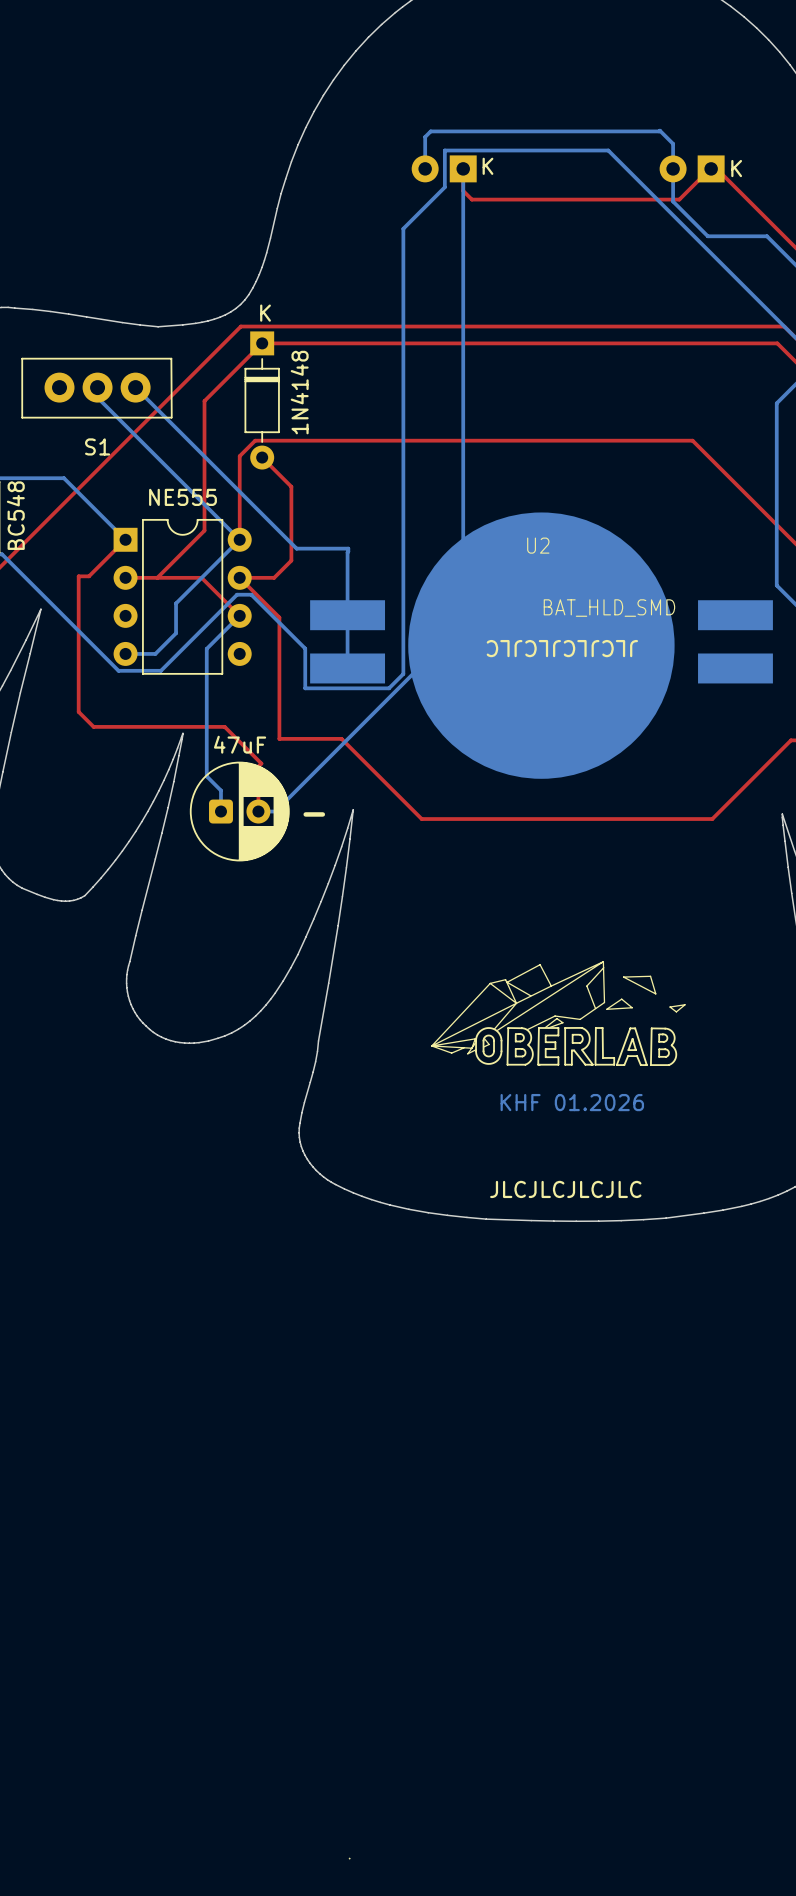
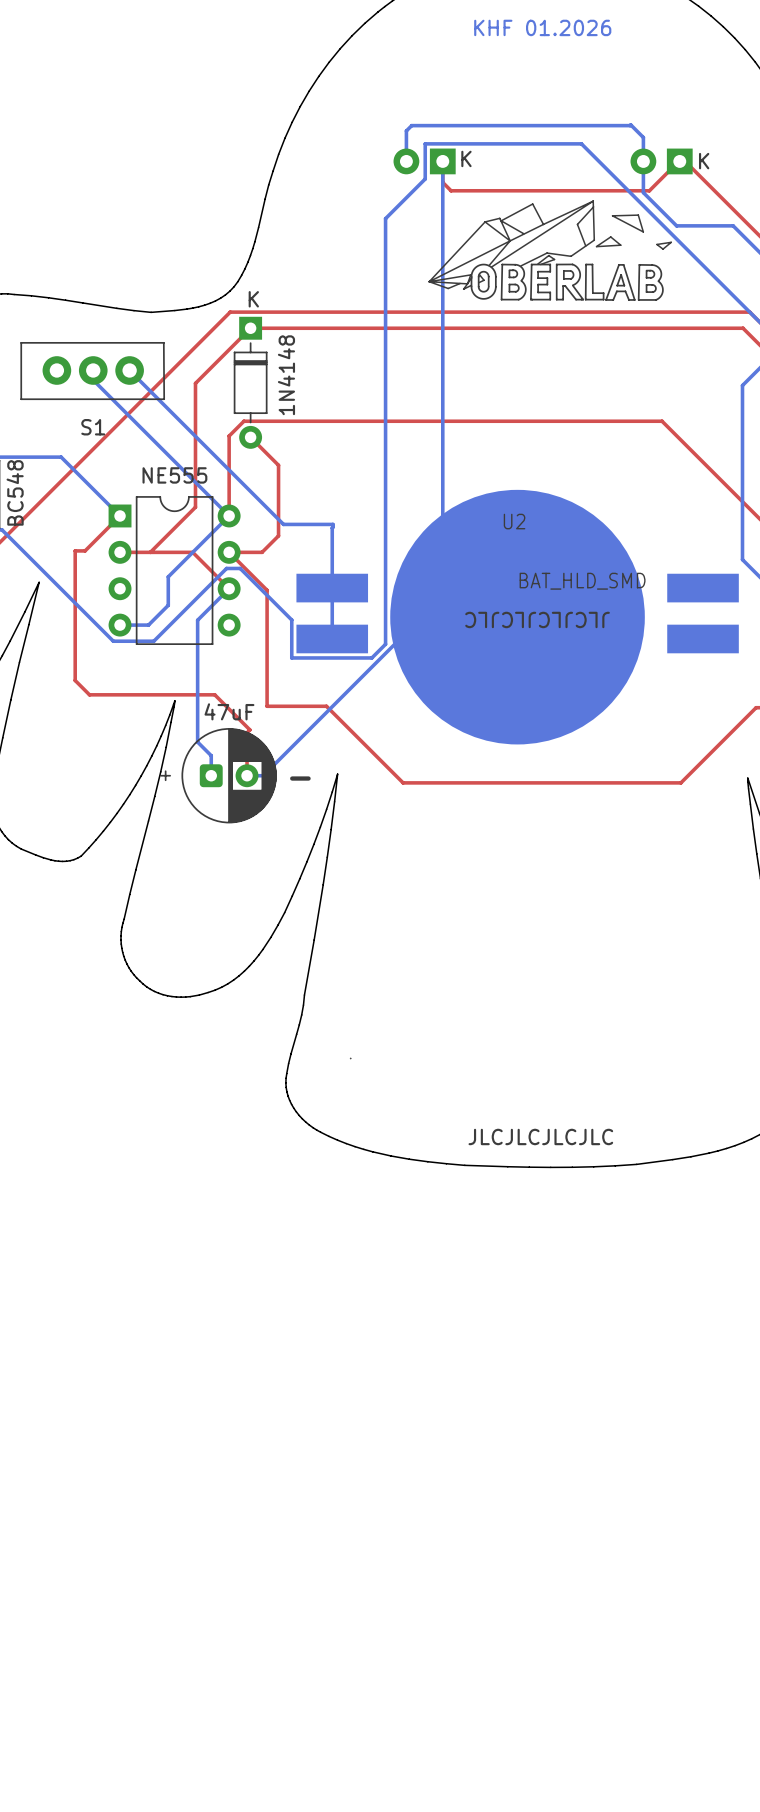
text: none -> KHF 01.2026 (542, 27)
drawing: none -> [349, 200, 672, 1060]
47uF footprint: [189, 761, 290, 862] -> [160, 728, 277, 824]
drawing: [348, 961, 686, 1860] -> none
text: KHF 01.2026 (572, 1102) -> none

